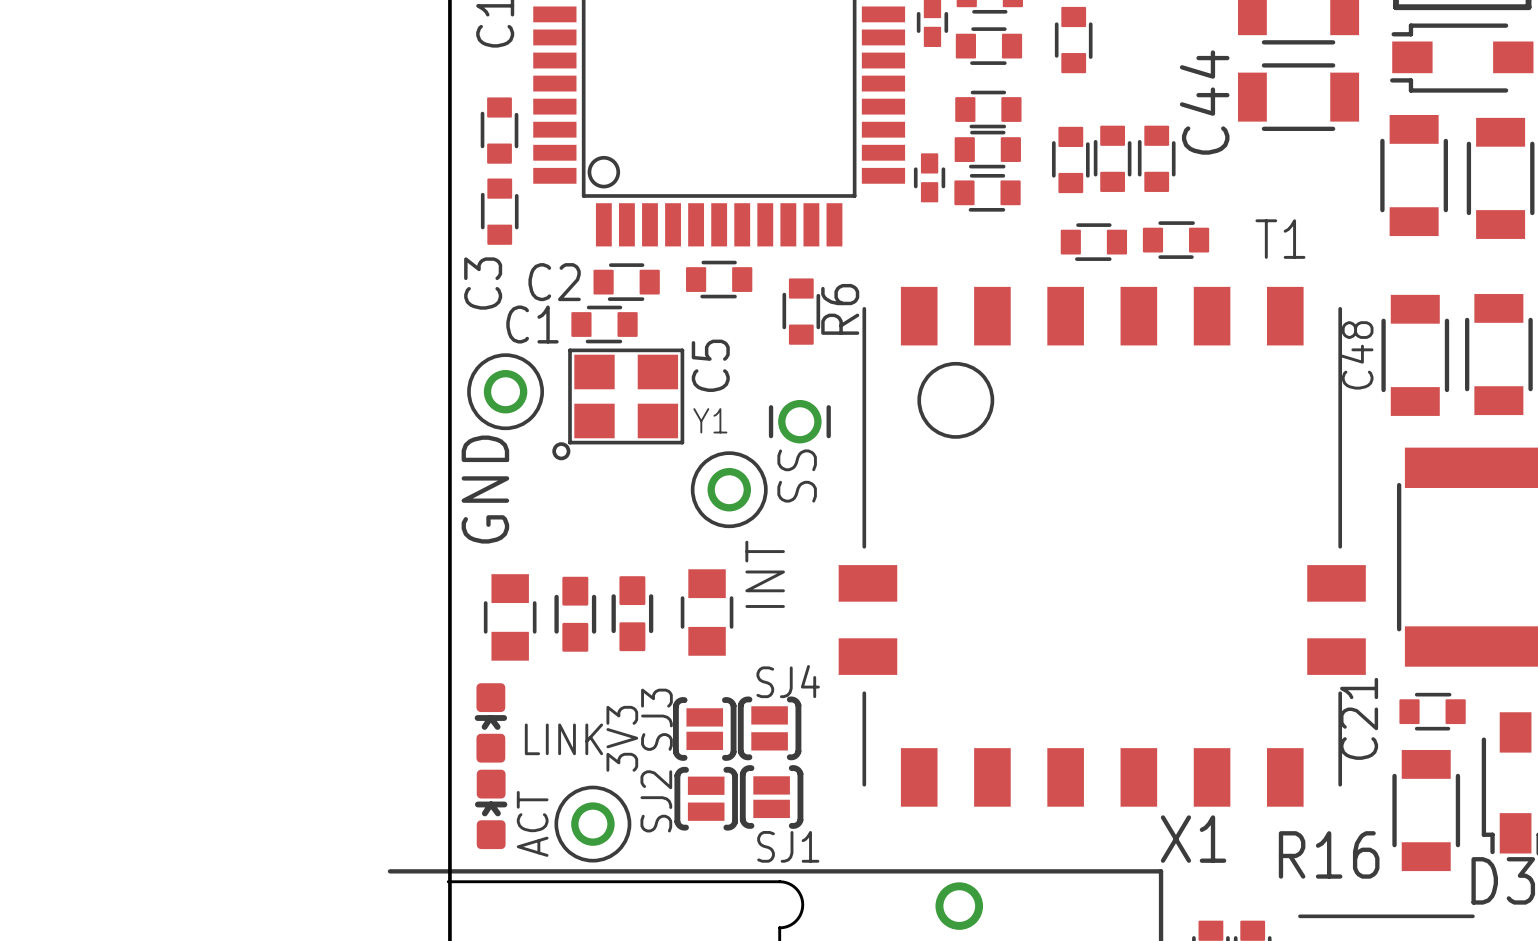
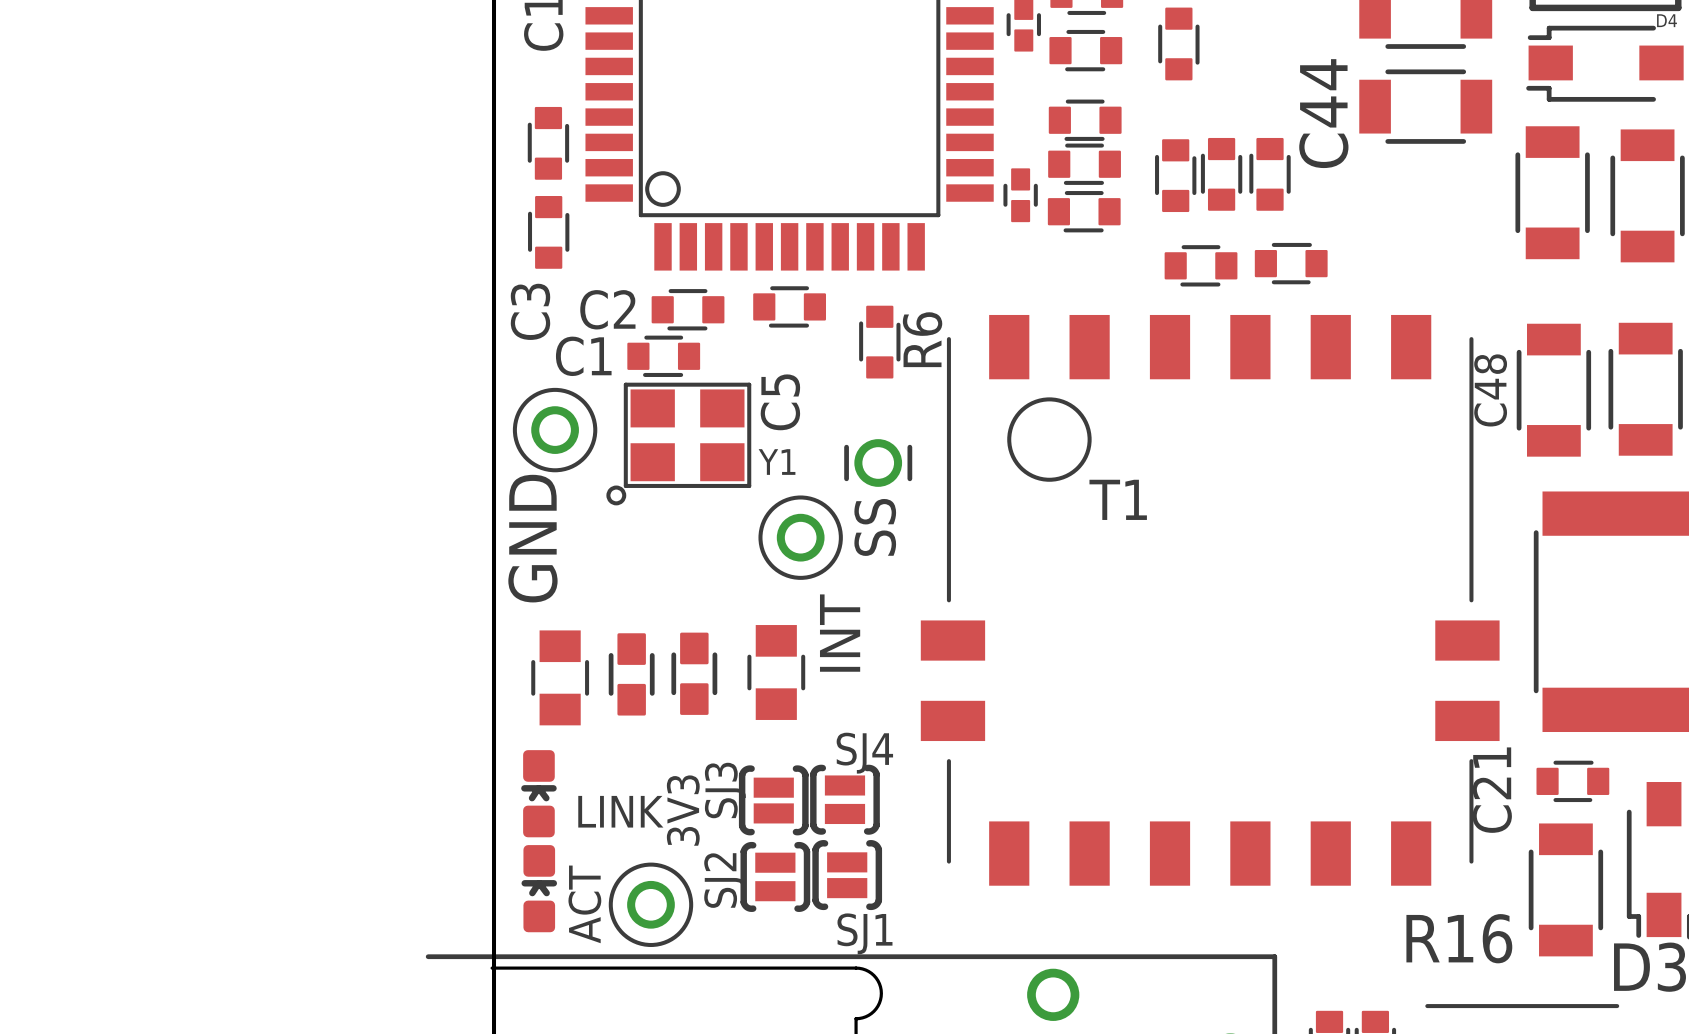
D4 name: none -> D4 (1667, 20)
T1 name position: T1 (1280, 239) -> T1 (1118, 499)
X1 name: X1 (1193, 839) -> none

